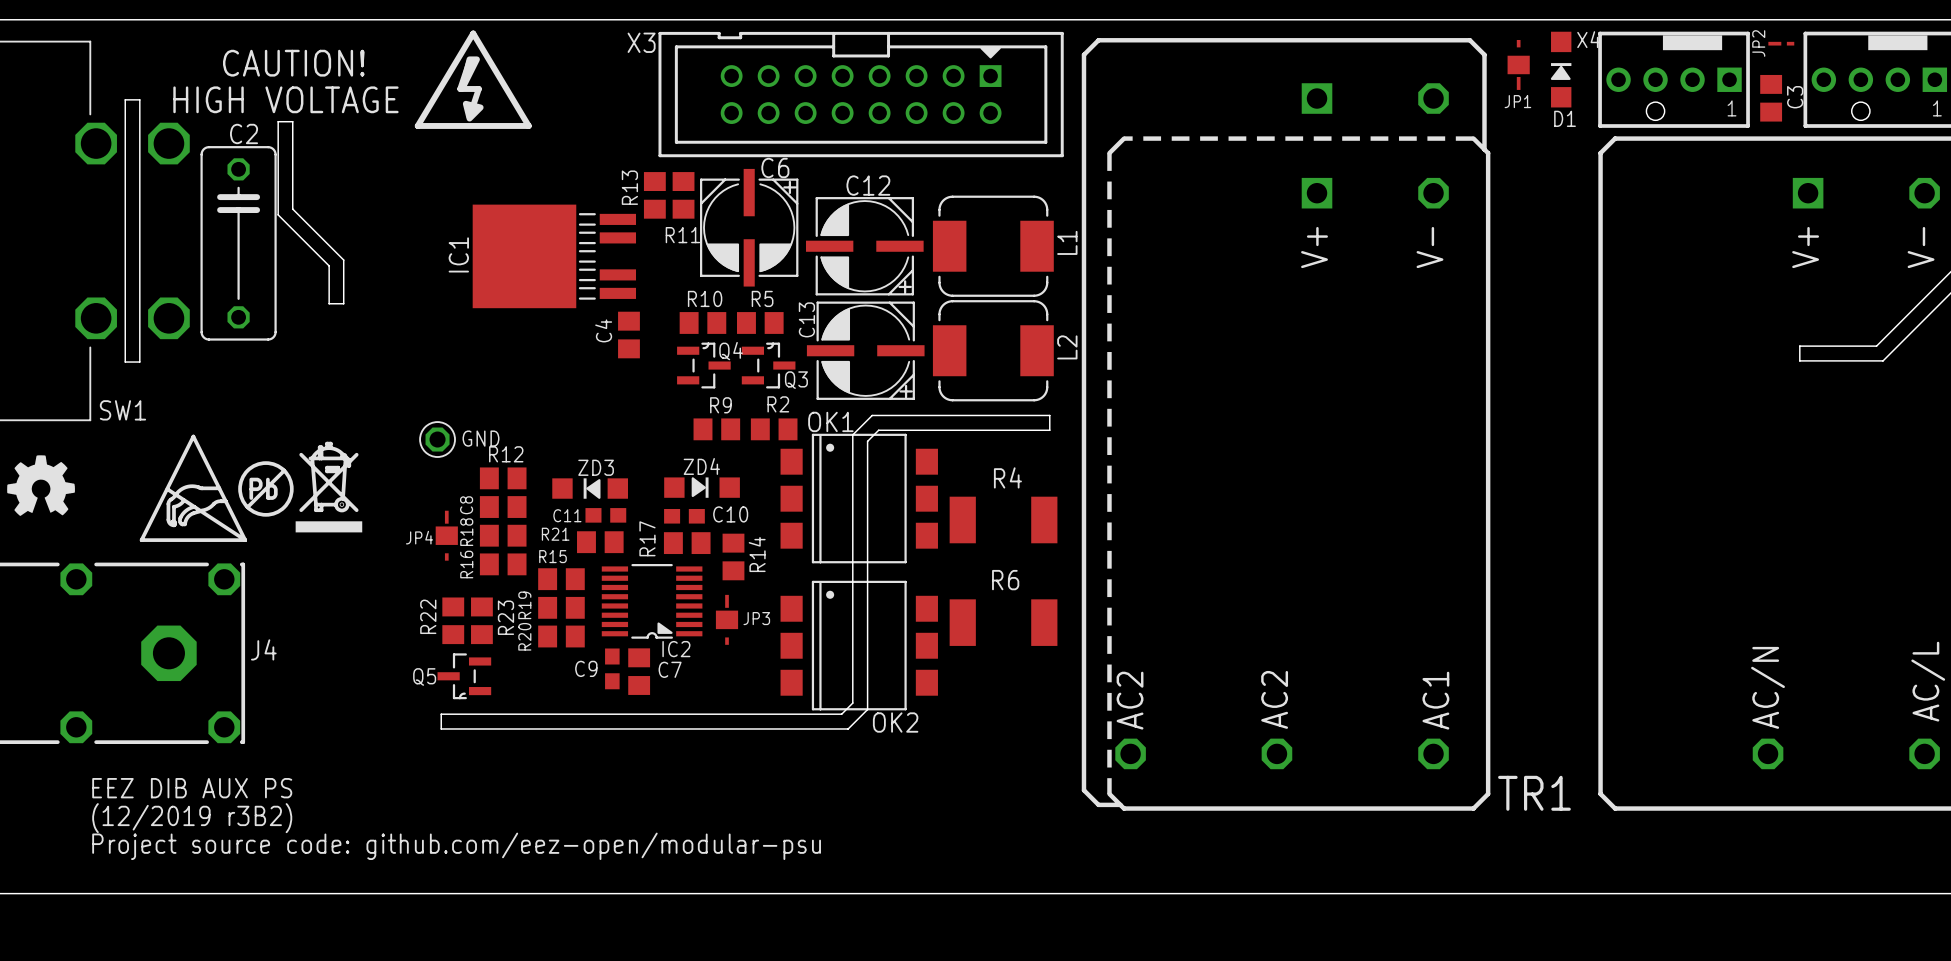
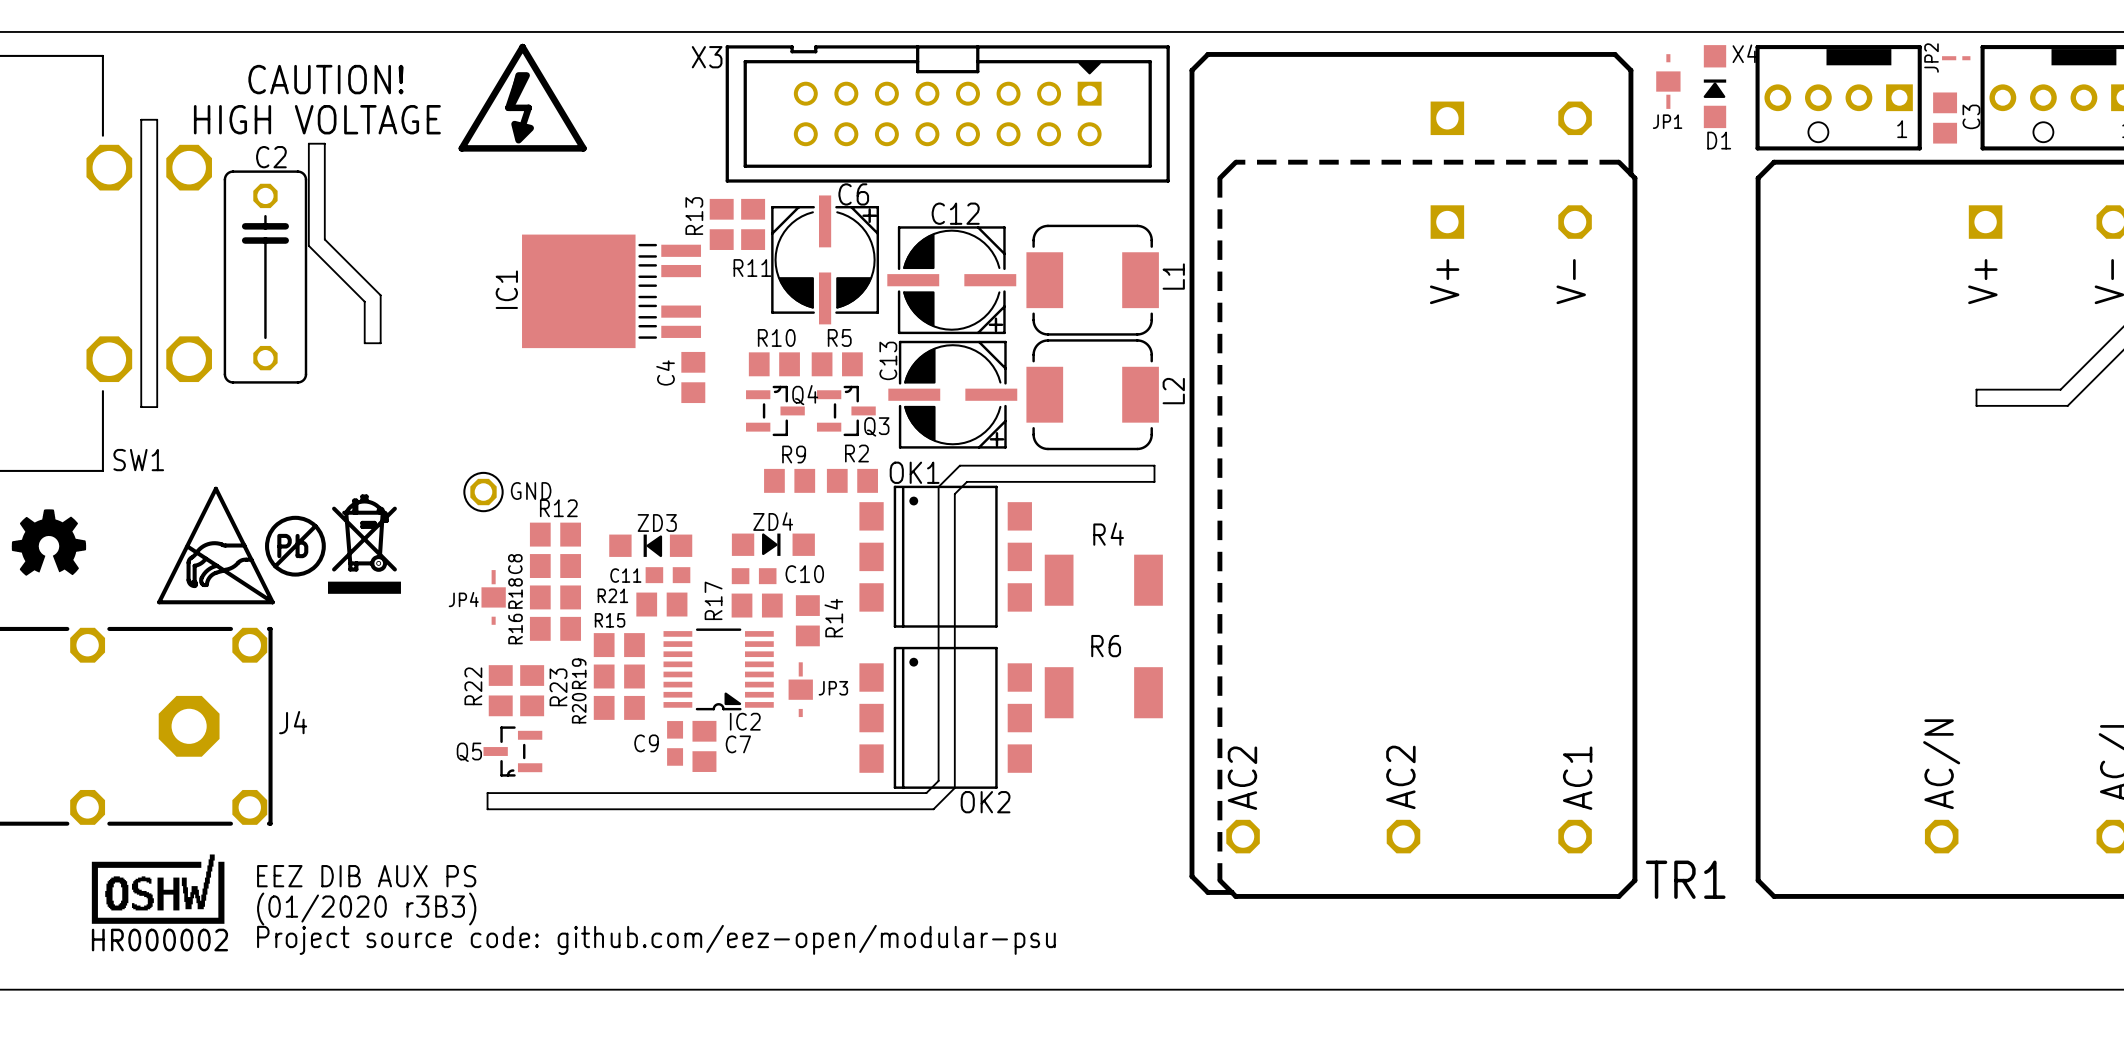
drawing: none -> [91, 854, 225, 924]
text position: EEZ DIB AUX PS (192, 788) -> EEZ DIB AUX PS (366, 876)
text: (12/2019 r3B2) (192, 818) -> (01/2020 r3B3) (366, 908)
text position: Project source code: github.com/eez-open/modular-psu (456, 846) -> Project source code: github.com/eez-open/modular-psu (656, 939)

